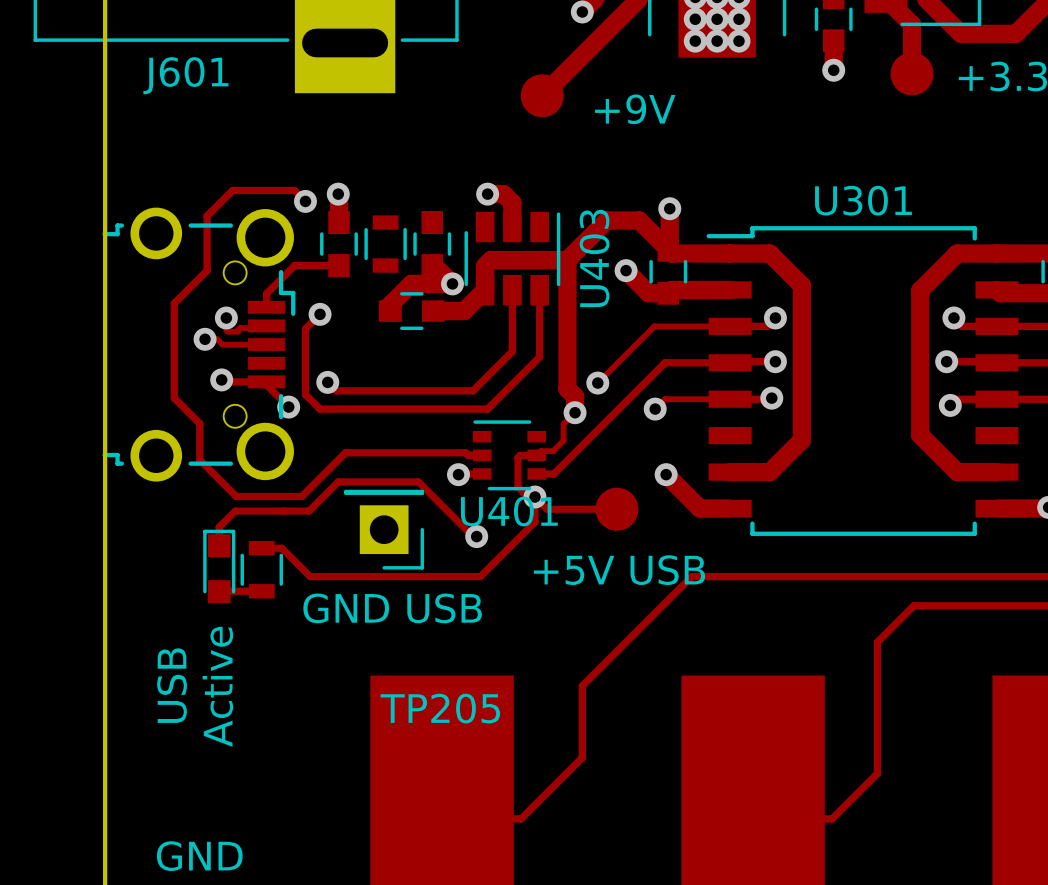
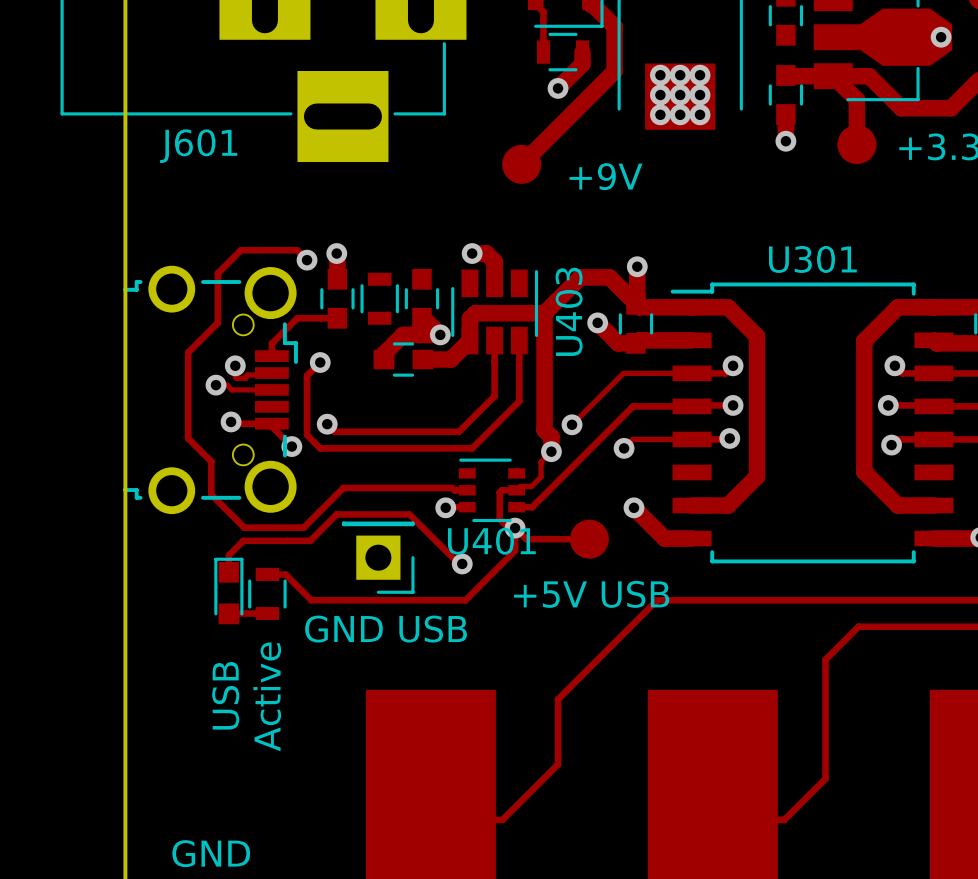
text: none -> Active (267, 696)
text: USB (172, 685) -> none
text: Active (217, 686) -> USB (225, 695)
TP205 name: TP205 (440, 708) -> none

